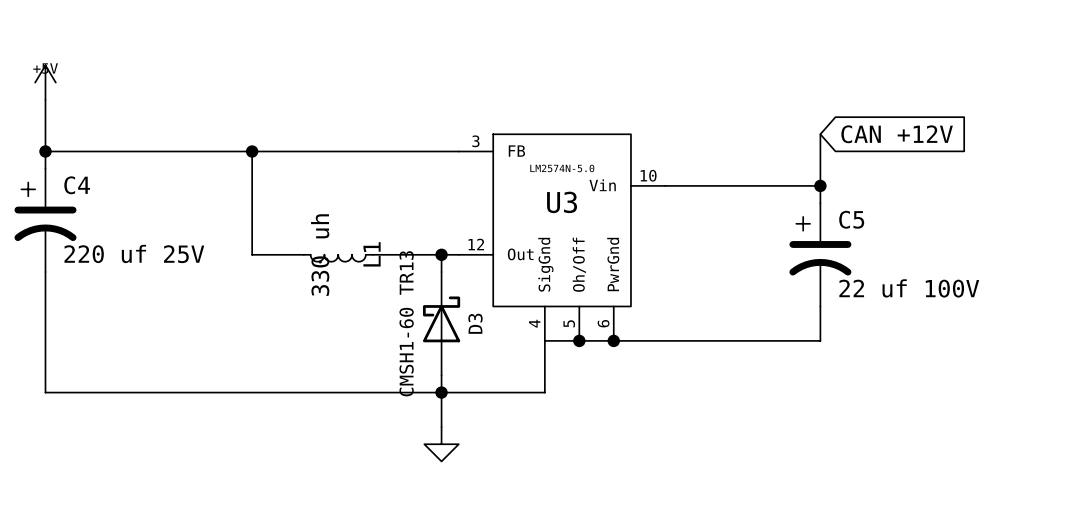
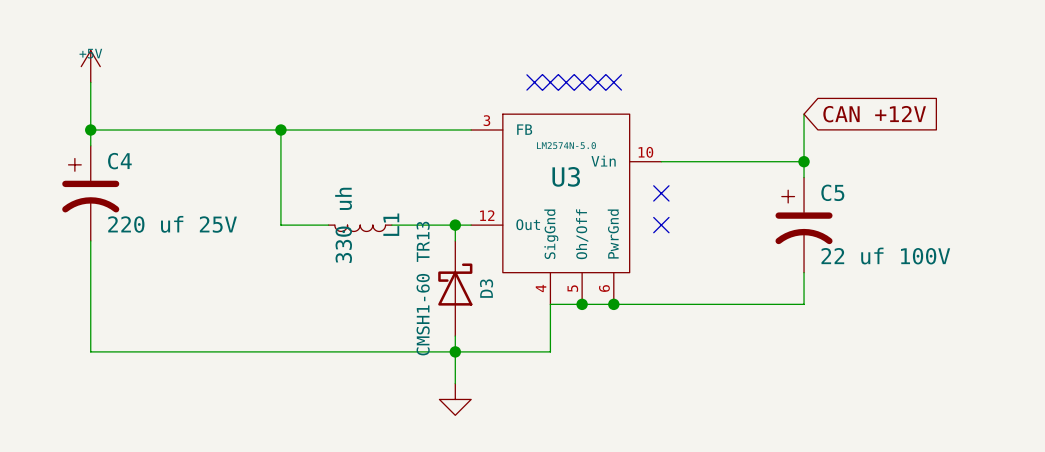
no-connect mark: none -> (534, 82)
no-connect mark: none -> (550, 82)
no-connect mark: none -> (566, 82)
no-connect mark: none -> (582, 82)
no-connect mark: none -> (597, 82)
no-connect mark: none -> (613, 82)
no-connect mark: none -> (661, 193)
no-connect mark: none -> (661, 225)

